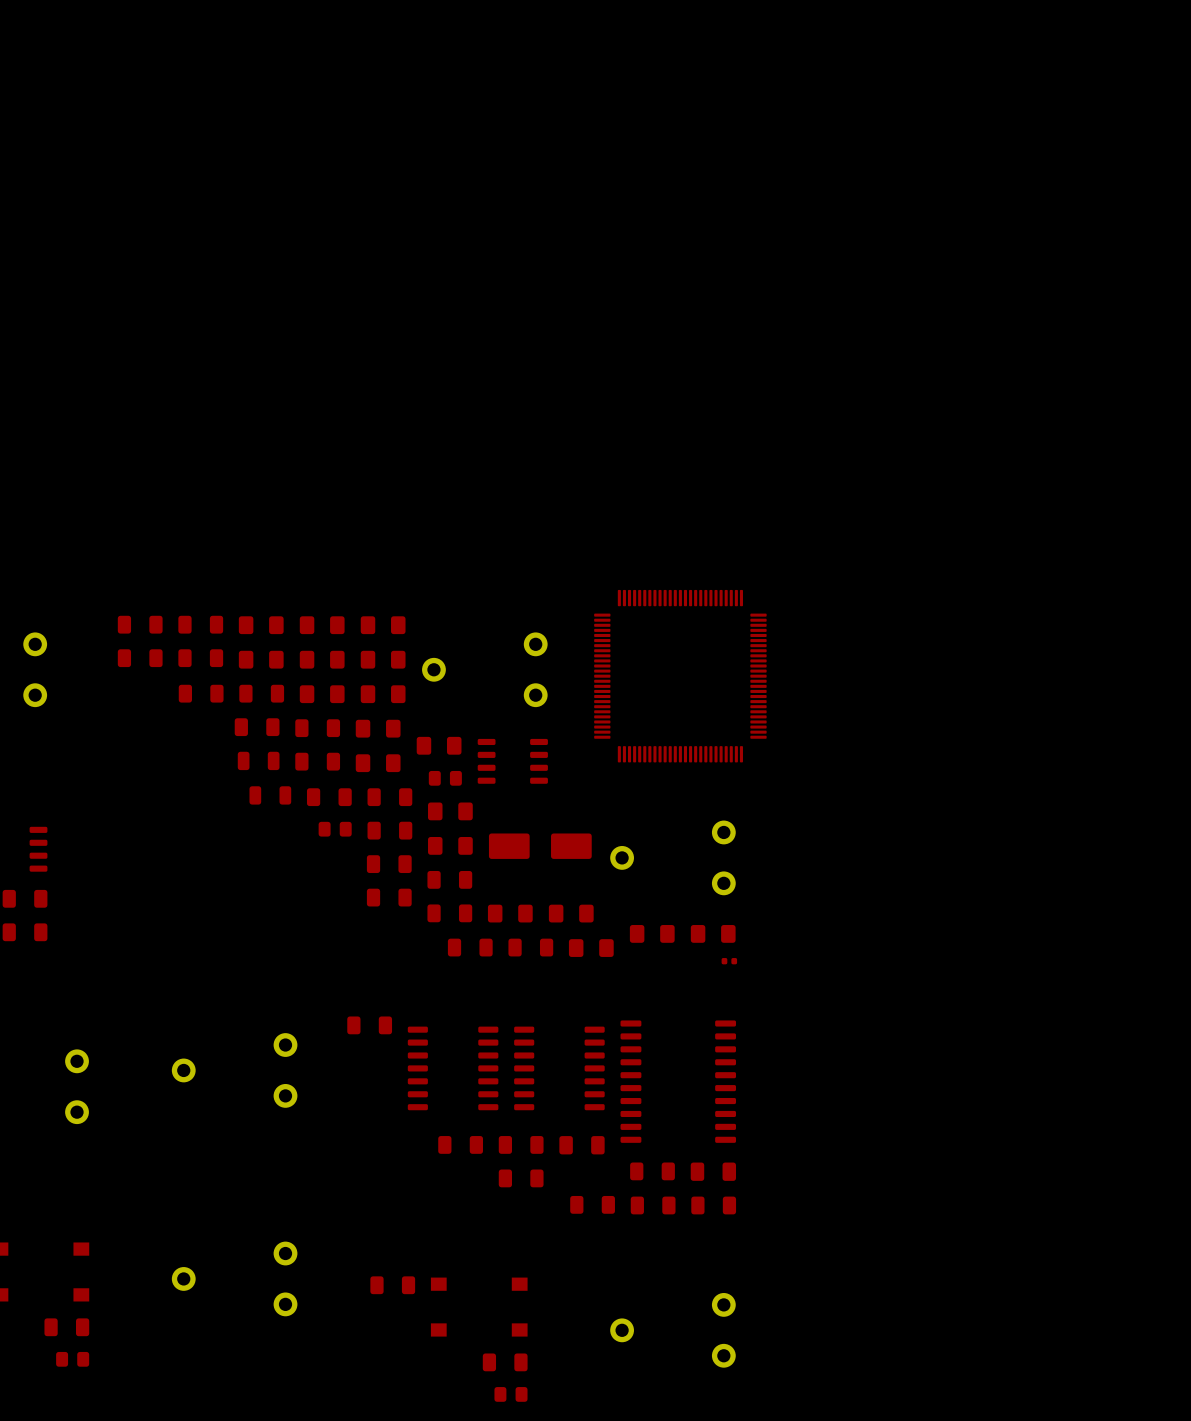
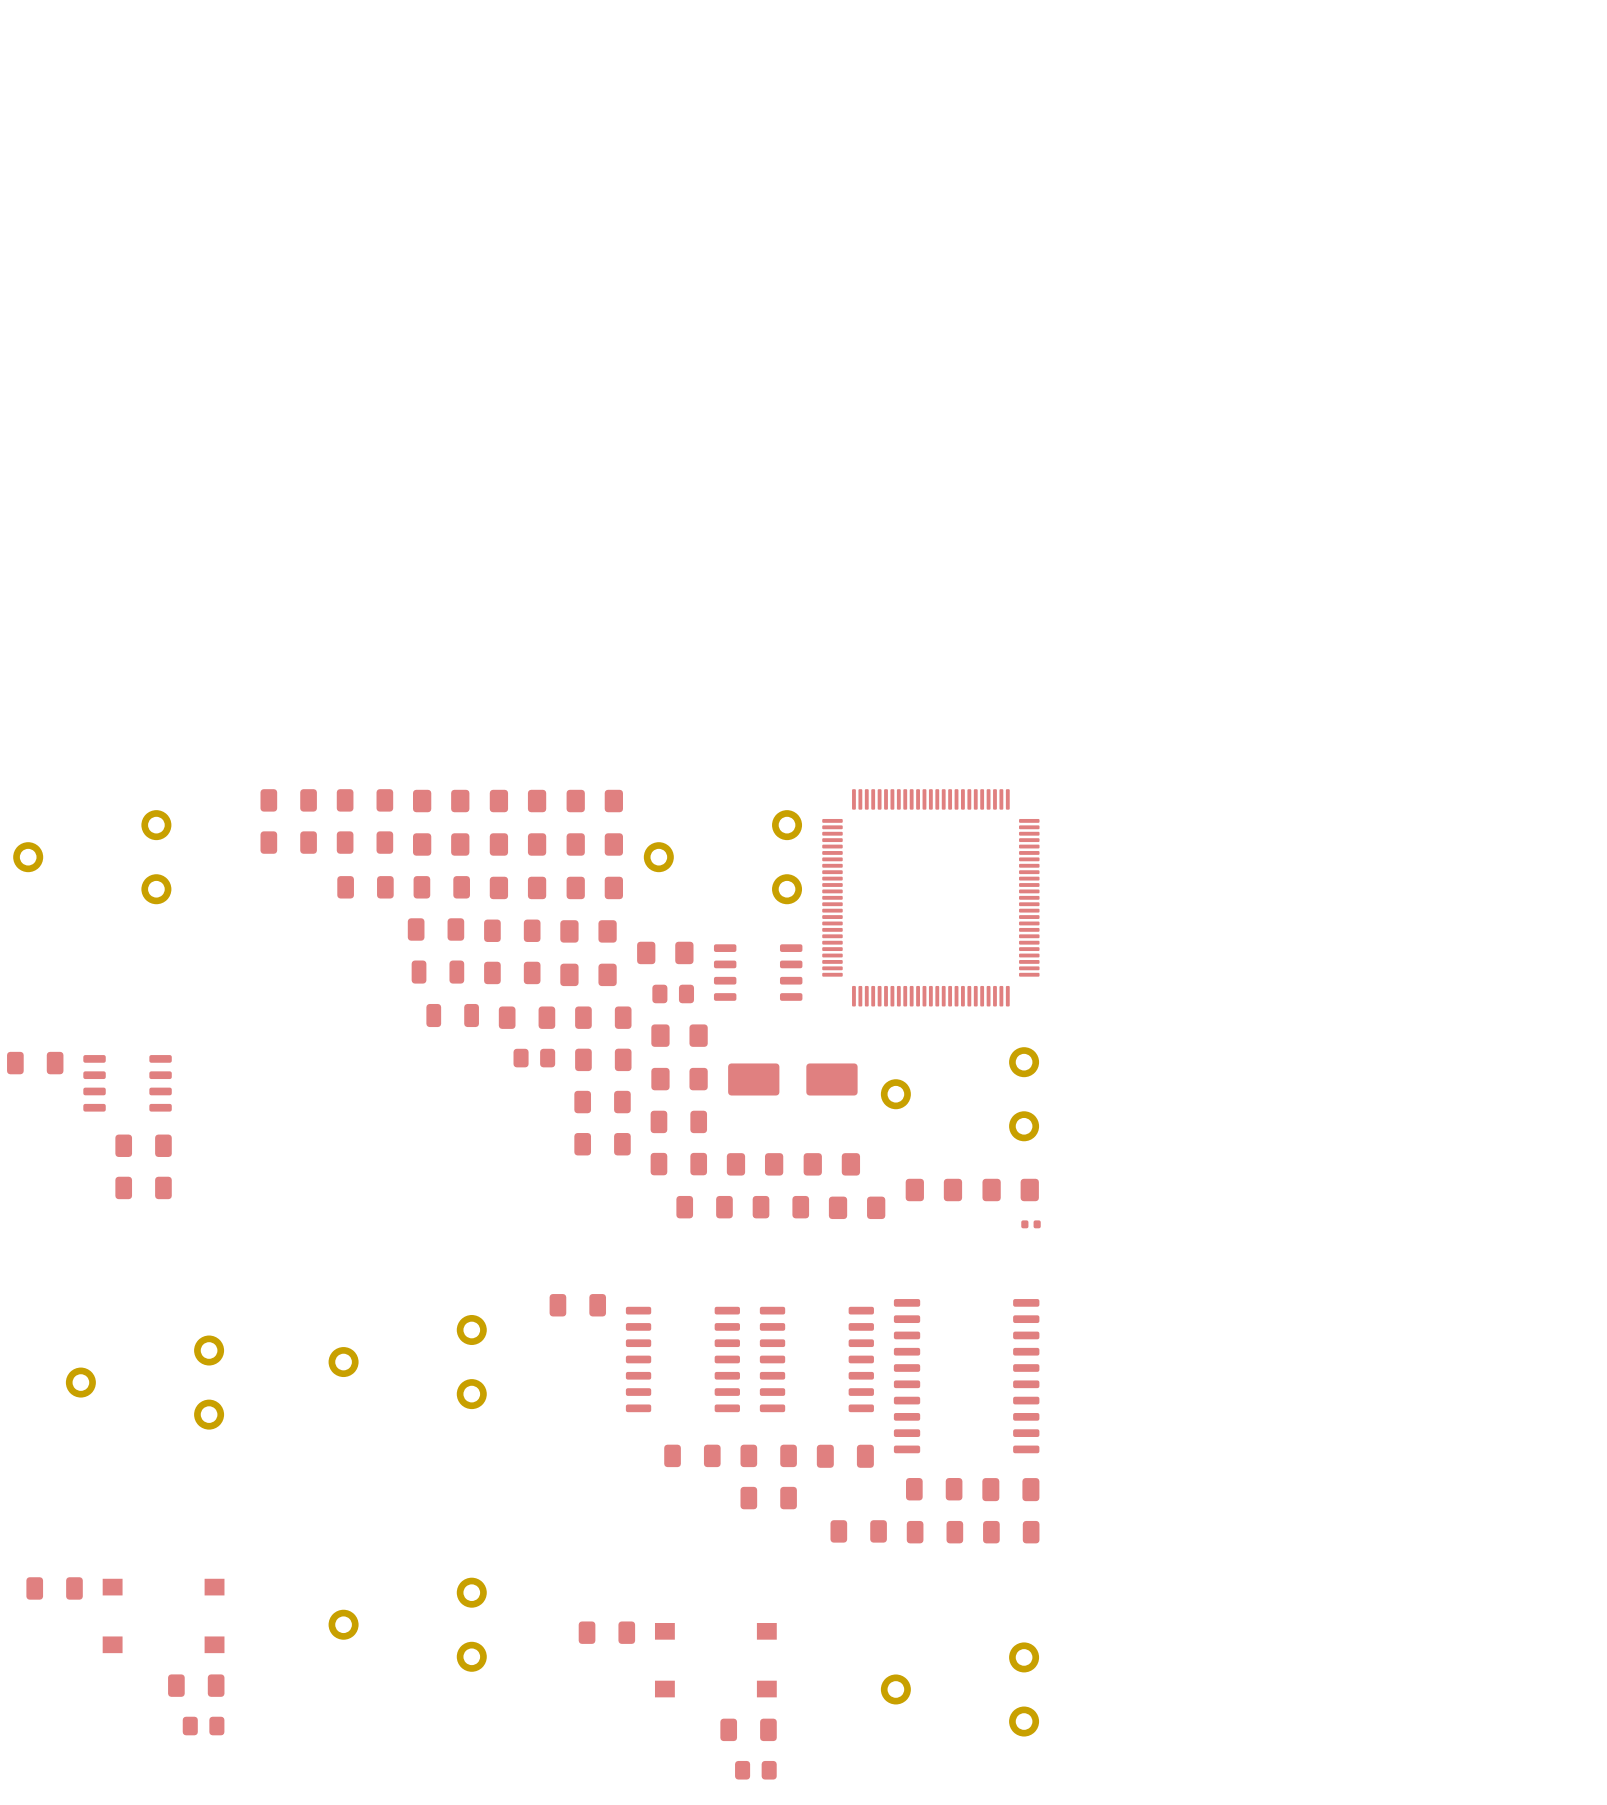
part position: (680, 676) -> (930, 897)

